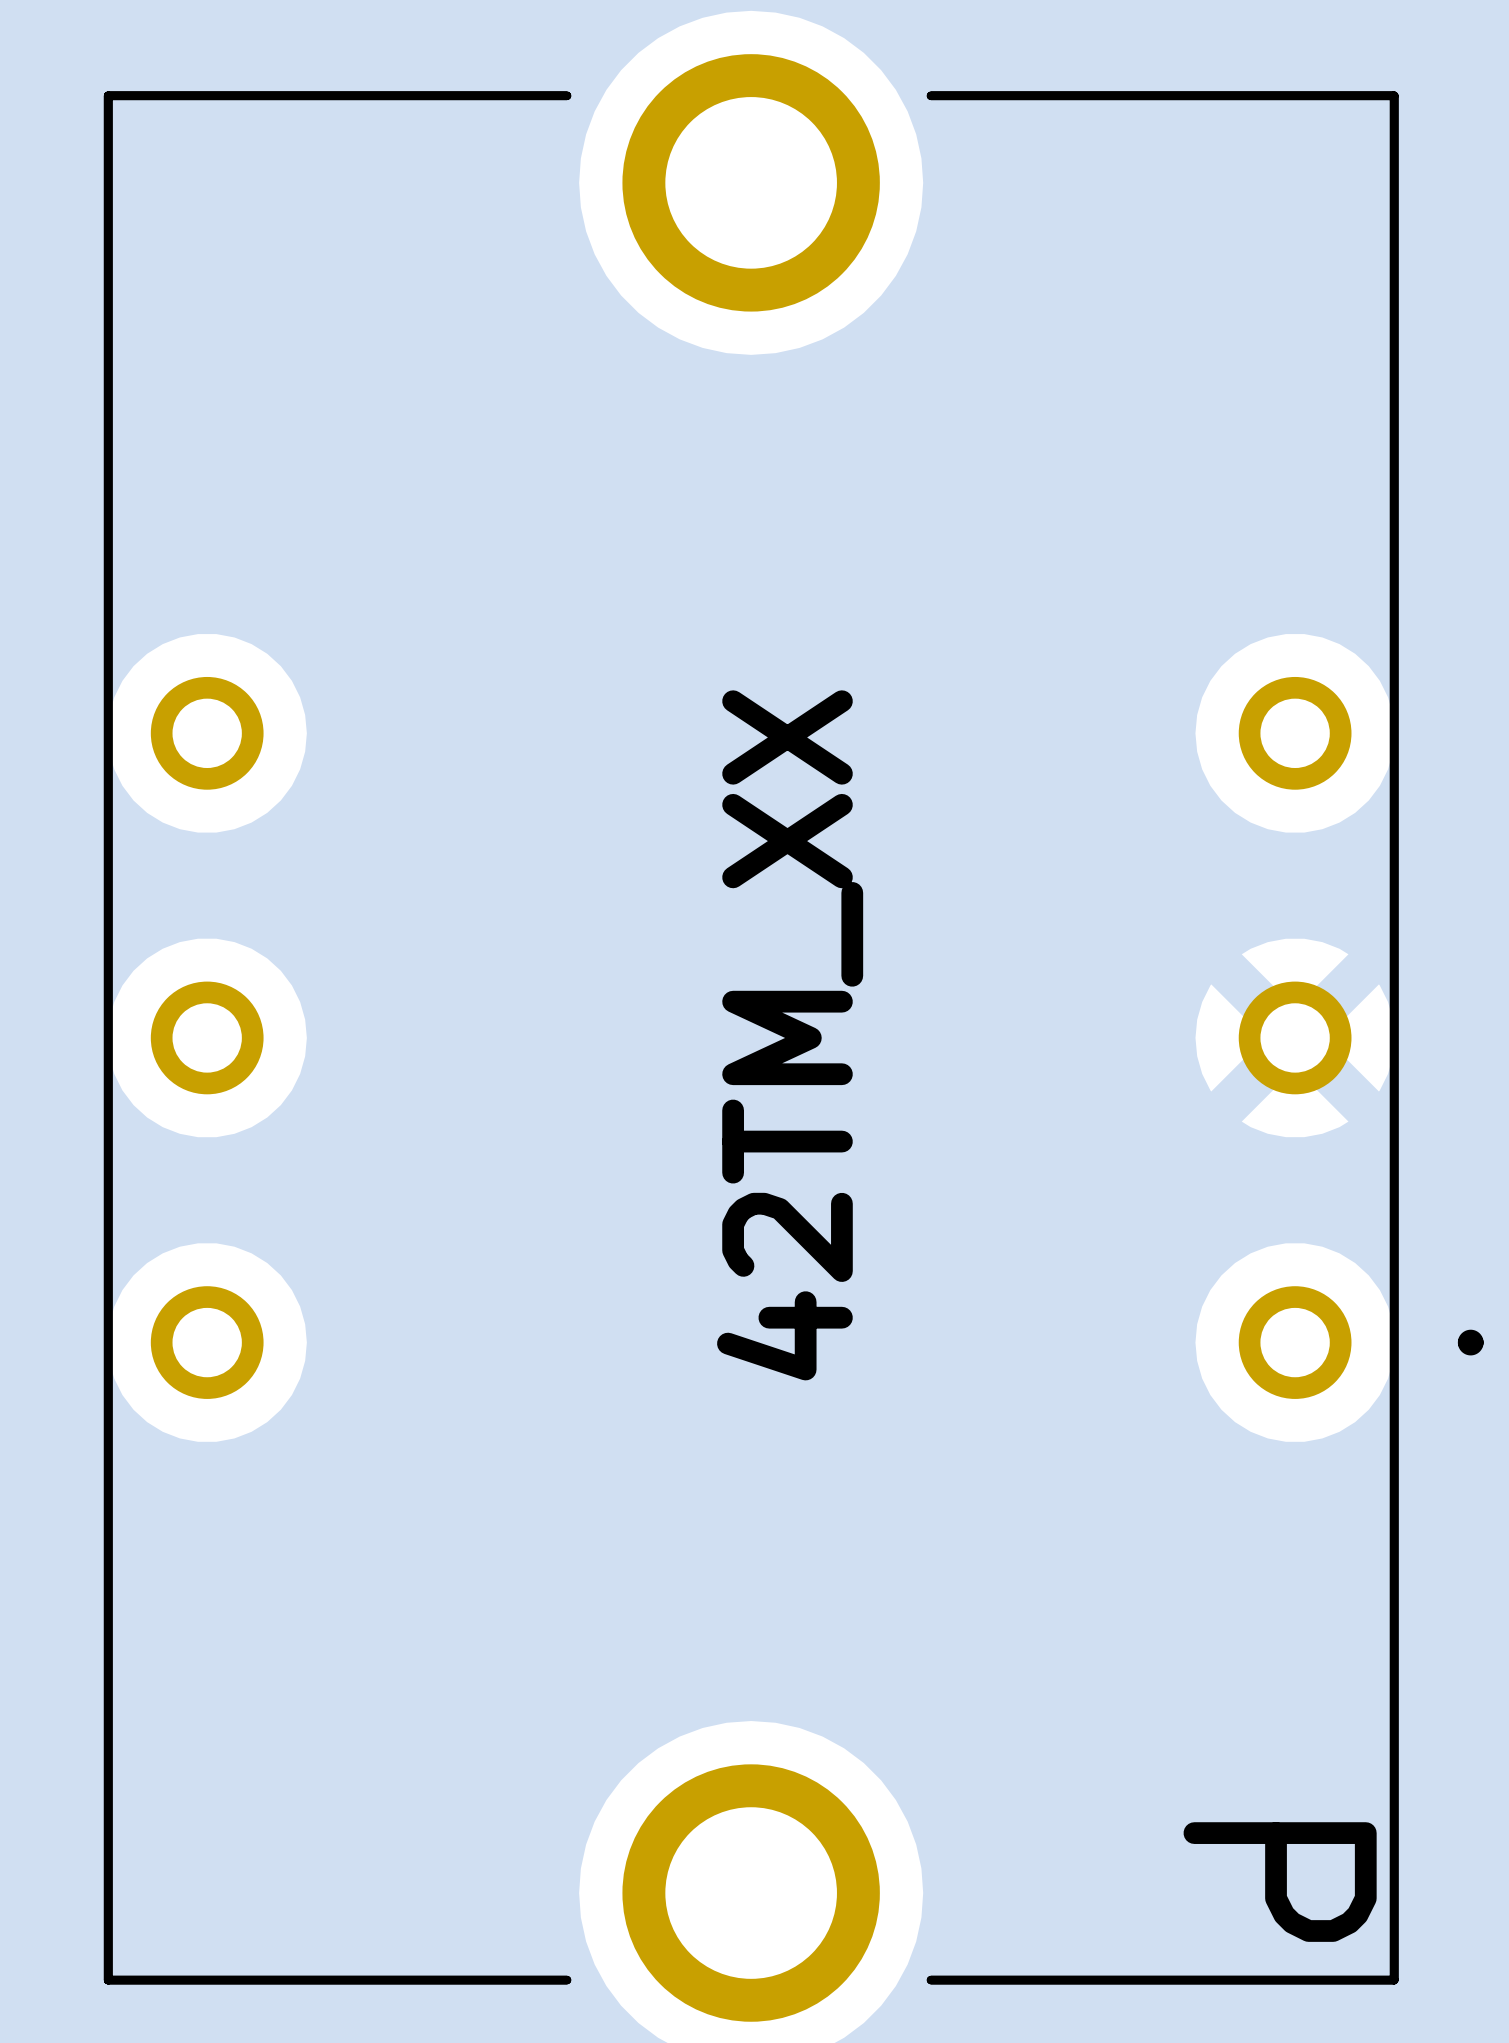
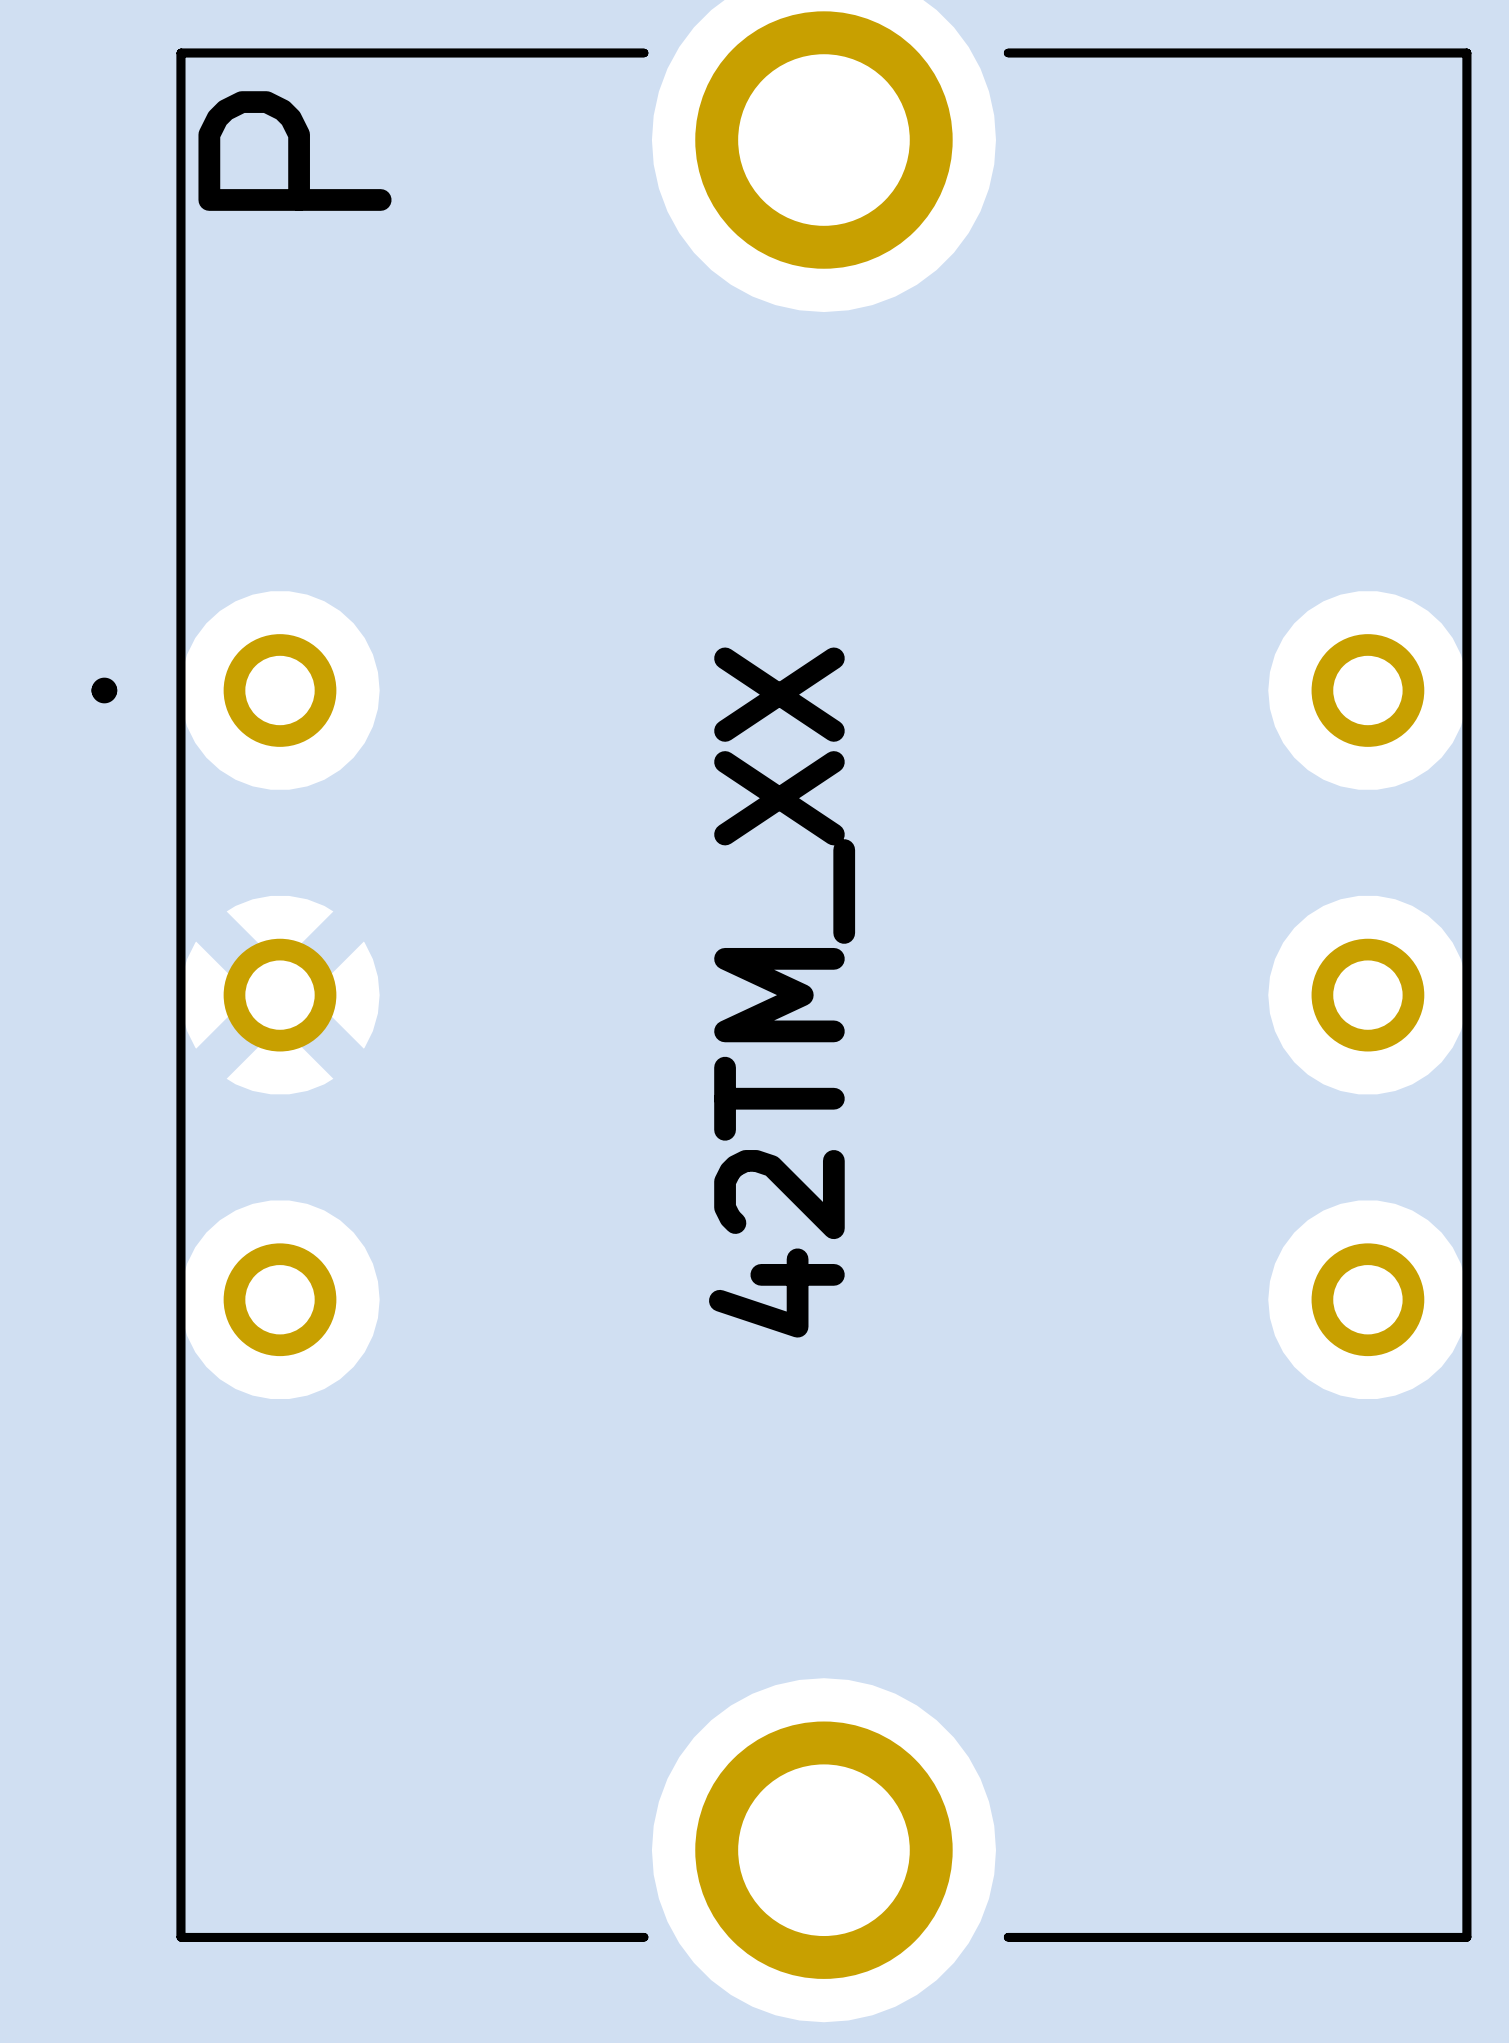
part rotation: 0° (793, 1037) -> 180° (781, 995)

